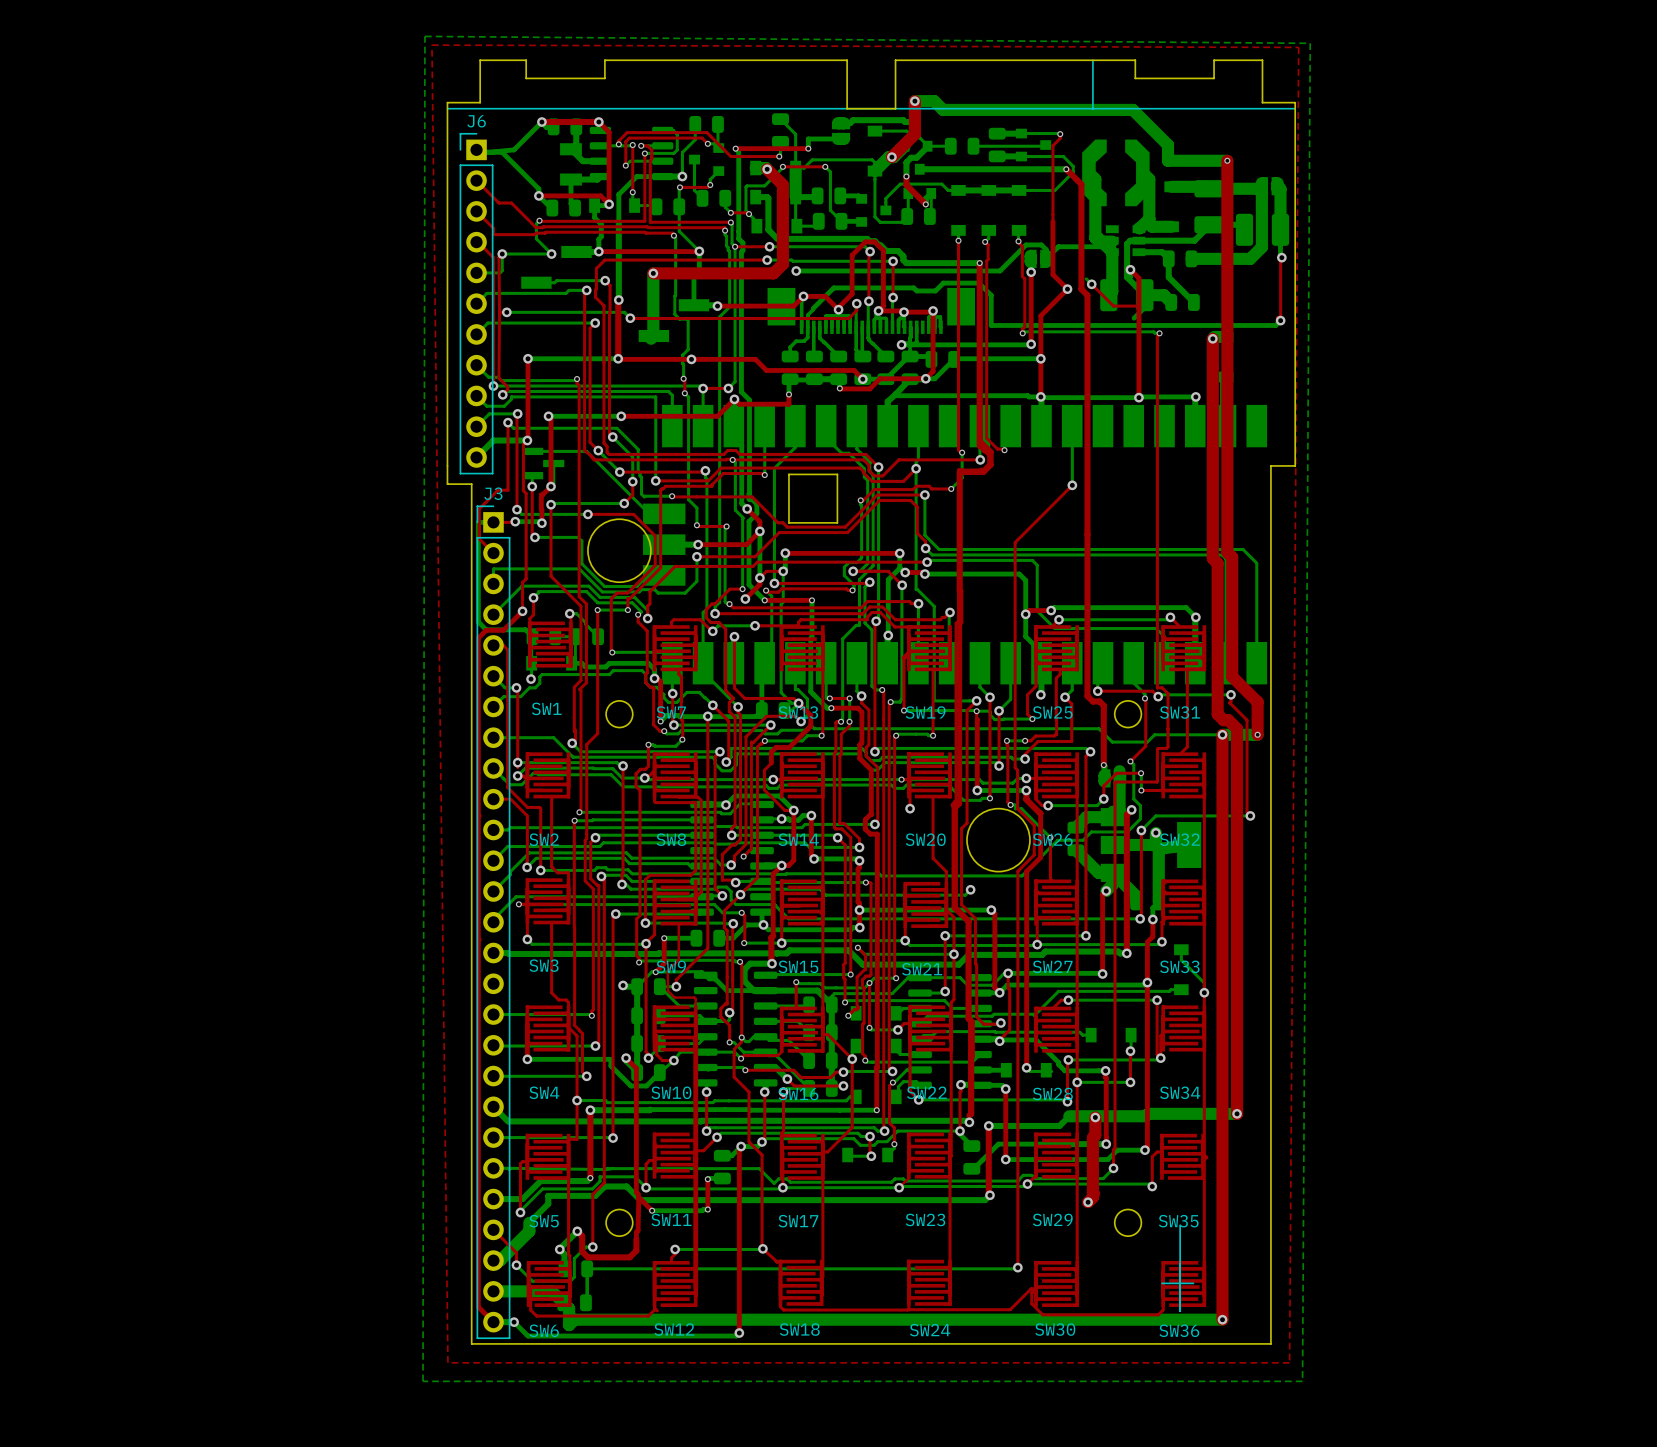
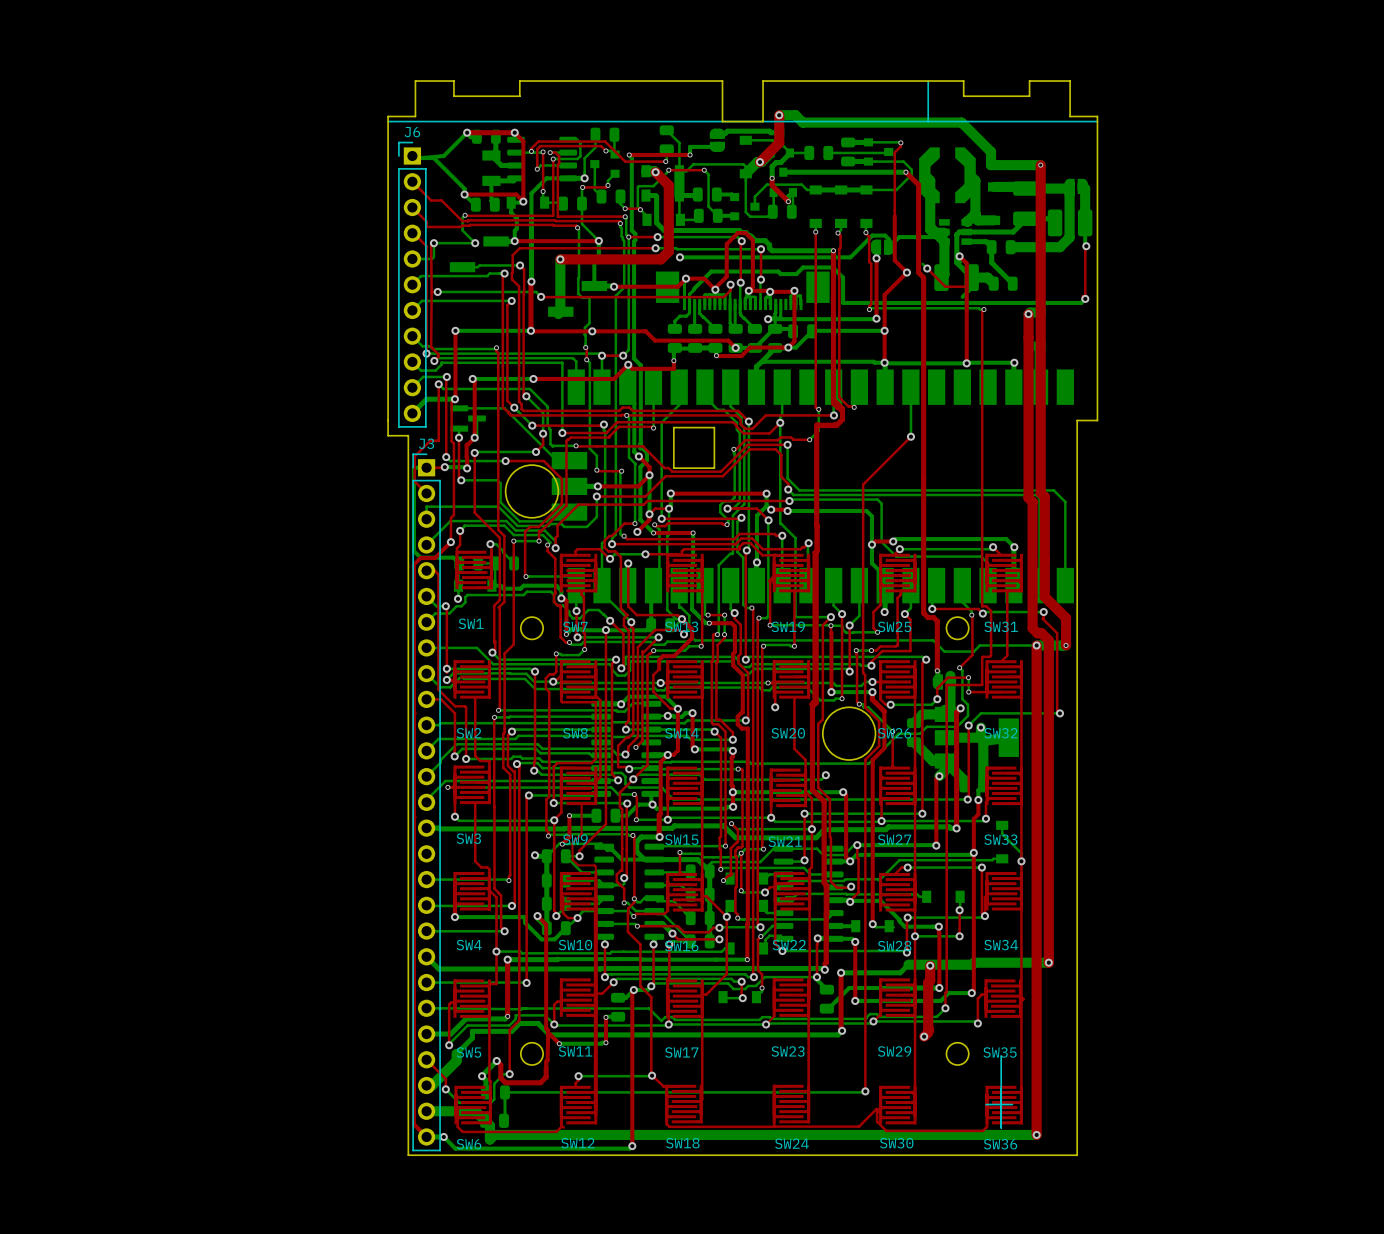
bottom zone outline: (424, 36) (423, 1381) (1302, 1381) (1310, 43) (424, 36) -> none
top zone outline: (431, 45) (447, 1362) (1289, 1362) (1298, 47) (431, 45) -> none

